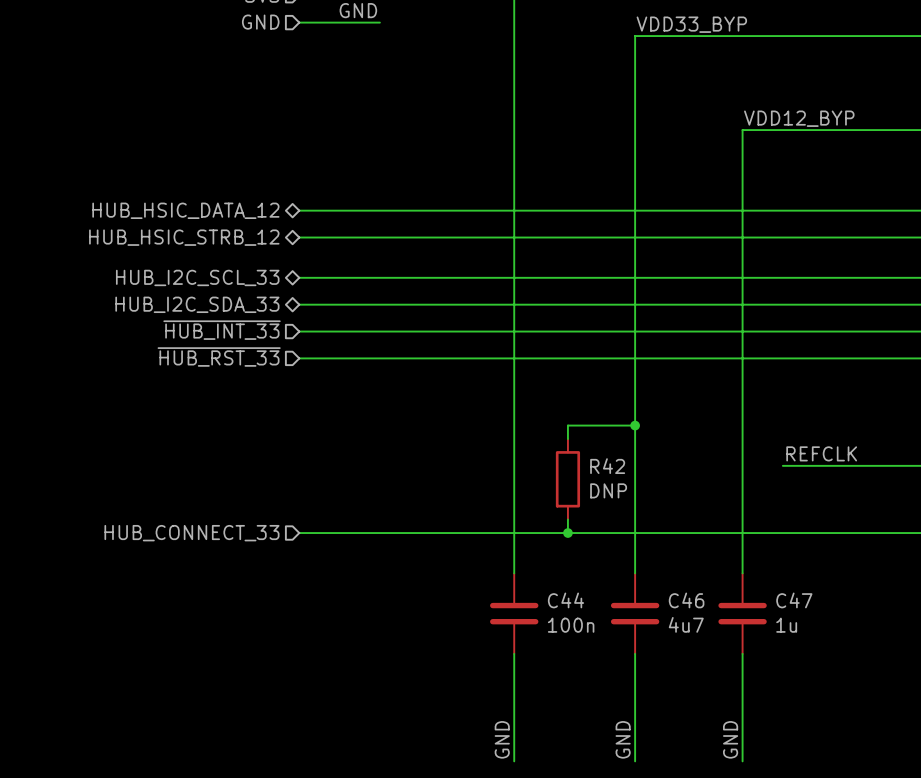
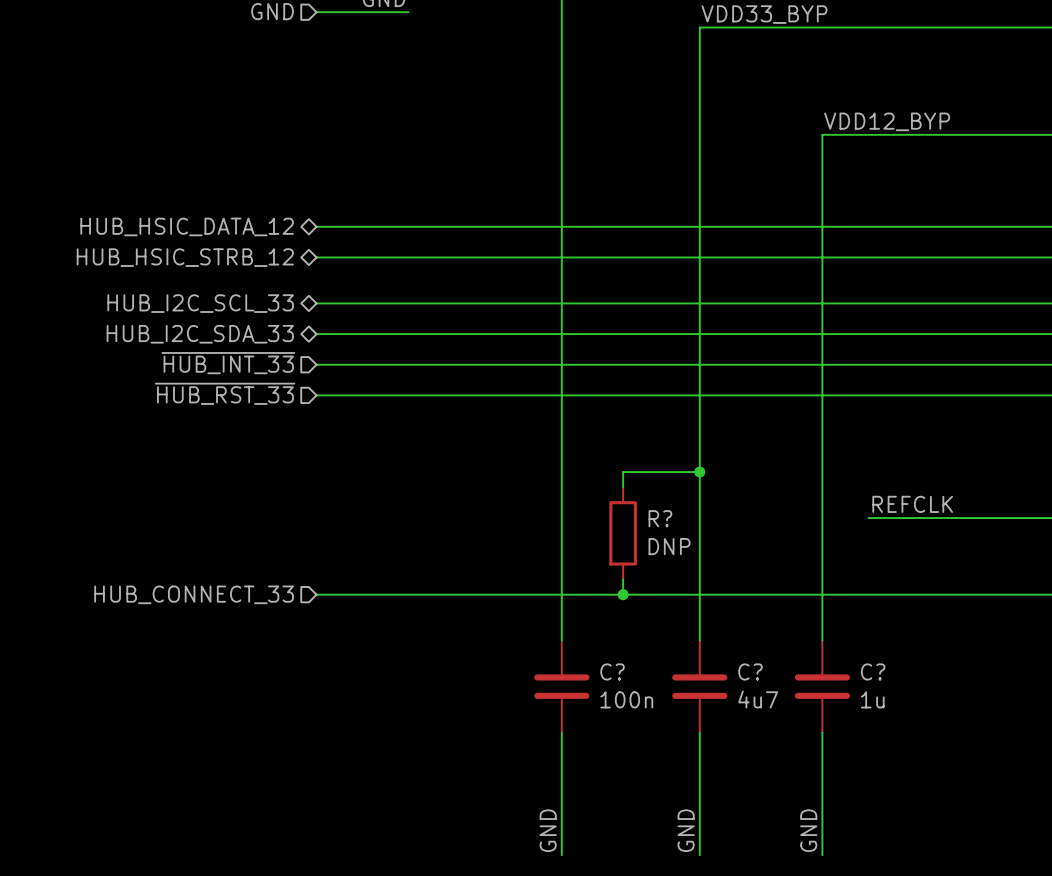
R42 name: R42 (607, 466) -> R? (660, 518)
C44 name: C44 (566, 600) -> C? (612, 671)
C46 name: C46 (686, 600) -> C? (750, 671)
C47 name: C47 (794, 600) -> C? (873, 671)

